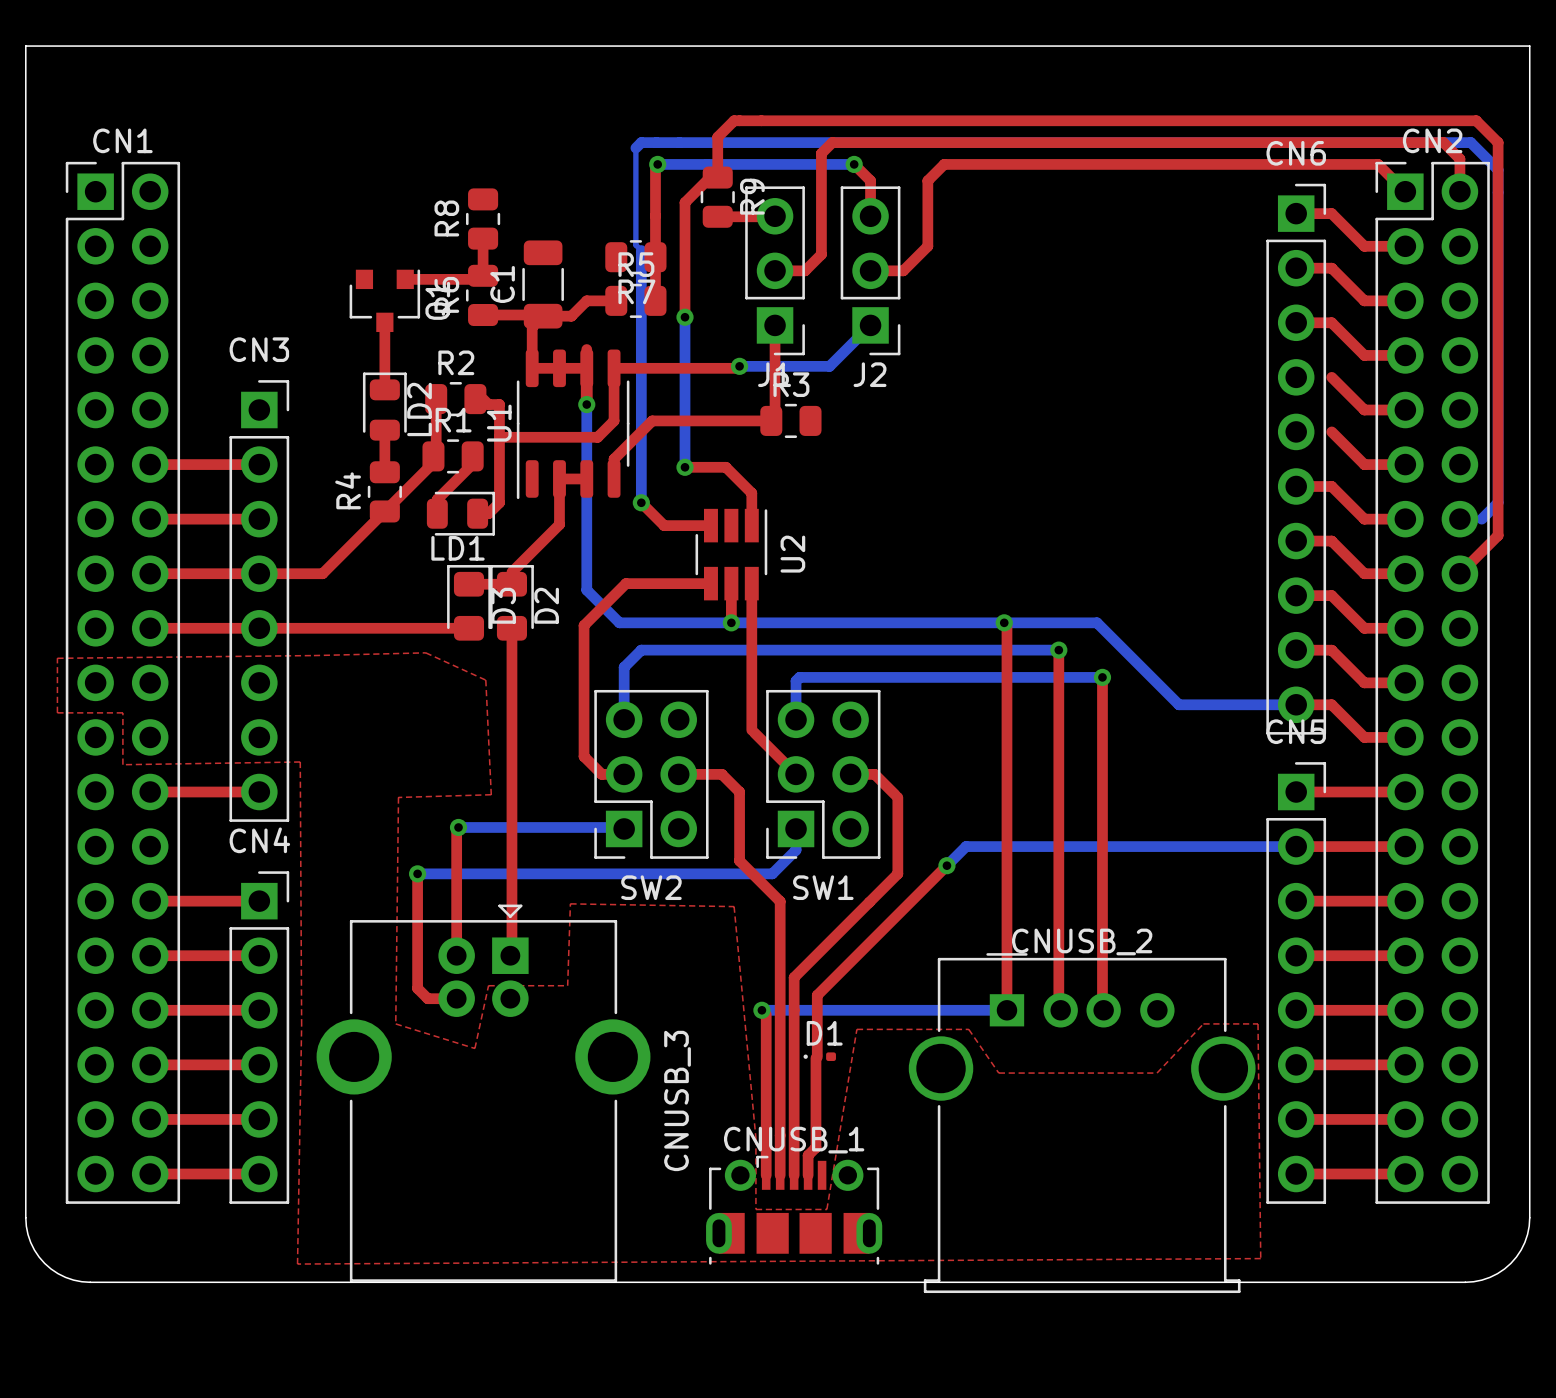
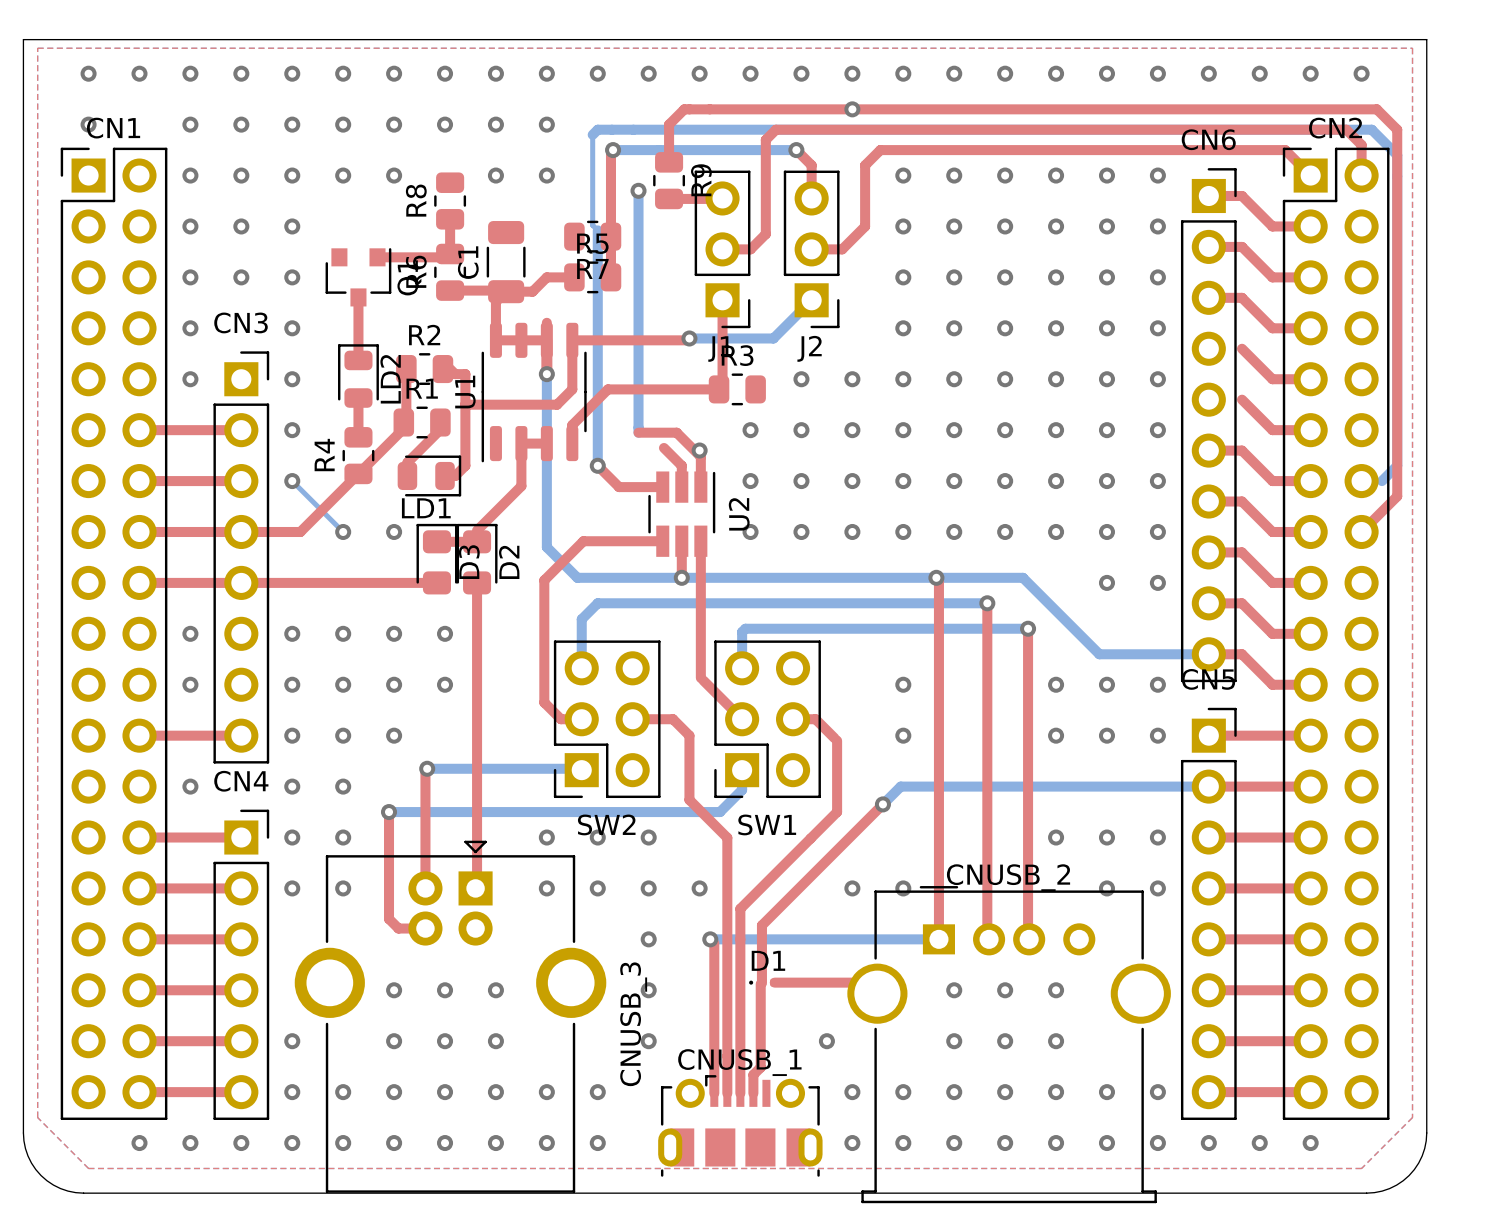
top zone outline: none -> (37, 48) (37, 1117) (88, 1168) (1361, 1168) (1412, 1117) (1412, 48) (37, 48)
via: none -> (88, 73)
via: none -> (139, 73)
via: none -> (190, 73)
via: none -> (241, 73)
via: none -> (292, 73)
via: none -> (343, 73)
via: none -> (394, 73)
via: none -> (445, 73)
via: none -> (495, 73)
via: none -> (546, 73)
via: none -> (597, 73)
via: none -> (648, 73)
via: none -> (699, 73)
via: none -> (750, 73)
via: none -> (801, 73)
via: none -> (852, 73)
via: none -> (903, 73)
via: none -> (954, 73)
via: none -> (1005, 73)
via: none -> (1056, 73)
via: none -> (1106, 73)
via: none -> (1157, 73)
via: none -> (1208, 73)
via: none -> (1259, 73)
via: none -> (1310, 73)
via: none -> (1361, 73)
via: none -> (852, 109)
via: none -> (88, 124)
via: none -> (190, 124)
via: none -> (241, 124)
via: none -> (292, 124)
via: none -> (343, 124)
via: none -> (394, 124)
via: none -> (445, 124)
via: none -> (495, 124)
via: none -> (546, 124)
top track: (710, 177) (685, 202) (685, 317) -> none
via: none -> (190, 175)
via: none -> (241, 175)
via: none -> (292, 175)
via: none -> (343, 175)
via: none -> (394, 175)
via: none -> (495, 175)
via: none -> (546, 175)
via: none -> (903, 175)
via: none -> (954, 175)
via: none -> (1005, 175)
via: none -> (1056, 175)
via: none -> (1106, 175)
via: none -> (1157, 175)
bottom track: none -> (638, 190) (638, 292)
via: none -> (638, 190)
via: none -> (190, 226)
via: none -> (241, 226)
via: none -> (292, 226)
via: none -> (903, 226)
via: none -> (954, 226)
via: none -> (1005, 226)
via: none -> (1056, 226)
via: none -> (1106, 226)
via: none -> (1157, 226)
via: none -> (190, 277)
via: none -> (241, 277)
via: none -> (292, 277)
via: none -> (903, 277)
via: none -> (954, 277)
via: none -> (1005, 277)
via: none -> (1056, 277)
via: none -> (1106, 277)
via: none -> (1157, 277)
via: (685, 317) -> none
via: none -> (190, 328)
via: none -> (292, 328)
via: none -> (903, 328)
via: none -> (954, 328)
via: none -> (1005, 328)
via: none -> (1056, 328)
via: none -> (1106, 328)
via: none -> (1157, 328)
via: none -> (190, 379)
via: none -> (292, 379)
via: none -> (801, 379)
via: none -> (852, 379)
via: none -> (903, 379)
via: none -> (954, 379)
via: none -> (1005, 379)
via: none -> (1056, 379)
via: none -> (1106, 379)
via: none -> (1157, 379)
via: none -> (292, 430)
via: none -> (750, 430)
via: none -> (801, 430)
via: none -> (852, 430)
via: none -> (903, 430)
via: none -> (954, 430)
via: none -> (1005, 430)
via: none -> (1056, 430)
via: none -> (1106, 430)
via: none -> (1157, 430)
via: (685, 467) -> none
top track: none -> (663, 447) (681, 465) (681, 487)
via: none -> (699, 450)
bottom track: none -> (292, 481) (343, 531)
via: none -> (292, 481)
via: none -> (750, 481)
via: none -> (801, 481)
via: none -> (852, 481)
via: none -> (903, 481)
via: none -> (954, 481)
via: none -> (1005, 481)
via: none -> (1056, 481)
via: none -> (1106, 481)
via: none -> (1157, 481)
via: none -> (343, 531)
via: none -> (394, 531)
via: none -> (750, 531)
via: none -> (801, 531)
via: none -> (852, 531)
via: none -> (903, 531)
via: none -> (954, 531)
via: none -> (1005, 531)
via: none -> (1056, 531)
via: none -> (1106, 531)
via: none -> (1157, 531)
via: none -> (1106, 582)
via: none -> (1157, 582)
top zone outline: (425, 652) (485, 680) (491, 794) (398, 797) (395, 1023) (474, 1048) (488, 985) (567, 985) (570, 903) (734, 906) (755, 1138) (755, 1209) (826, 1209) (856, 1029) (968, 1029) (998, 1073) (1157, 1073) (1203, 1023) (1258, 1023) (1260, 1258) (297, 1264) (301, 1025) (300, 761) (122, 764) (122, 712) (57, 712) (57, 658) (425, 652) -> none
via: none -> (190, 633)
via: none -> (292, 633)
via: none -> (343, 633)
via: none -> (394, 633)
via: none -> (445, 633)
via: none -> (190, 684)
via: none -> (292, 684)
via: none -> (343, 684)
via: none -> (394, 684)
via: none -> (445, 684)
via: none -> (903, 684)
via: none -> (1056, 684)
via: none -> (1106, 684)
via: none -> (1157, 684)
via: none -> (292, 735)
via: none -> (343, 735)
via: none -> (394, 735)
via: none -> (903, 735)
via: none -> (1056, 735)
via: none -> (1106, 735)
via: none -> (1157, 735)
via: none -> (190, 786)
via: none -> (292, 786)
via: none -> (343, 786)
via: none -> (292, 837)
via: none -> (343, 837)
via: none -> (546, 837)
via: none -> (597, 837)
via: none -> (648, 837)
via: none -> (1056, 837)
via: none -> (1106, 837)
via: none -> (1157, 837)
via: none -> (292, 888)
via: none -> (343, 888)
via: none -> (546, 888)
via: none -> (597, 888)
via: none -> (648, 888)
via: none -> (699, 888)
via: none -> (852, 888)
via: none -> (903, 888)
via: none -> (1106, 888)
via: none -> (1157, 888)
via: none -> (648, 939)
top track: none -> (774, 982) (866, 982) (877, 993)
via: none -> (394, 990)
via: none -> (445, 990)
via: none -> (495, 990)
via: none -> (648, 990)
via: none -> (954, 990)
via: none -> (1005, 990)
via: none -> (1056, 990)
via: none -> (292, 1041)
via: none -> (394, 1041)
via: none -> (445, 1041)
via: none -> (495, 1041)
via: none -> (648, 1041)
via: none -> (826, 1041)
via: none -> (954, 1041)
via: none -> (1005, 1041)
via: none -> (1056, 1041)
via: none -> (292, 1092)
via: none -> (343, 1092)
via: none -> (394, 1092)
via: none -> (445, 1092)
via: none -> (495, 1092)
via: none -> (546, 1092)
via: none -> (597, 1092)
via: none -> (852, 1092)
via: none -> (903, 1092)
via: none -> (954, 1092)
via: none -> (1005, 1092)
via: none -> (1056, 1092)
via: none -> (1106, 1092)
via: none -> (1157, 1092)
via: none -> (139, 1143)
via: none -> (190, 1143)
via: none -> (241, 1143)
via: none -> (292, 1143)
via: none -> (343, 1143)
via: none -> (394, 1143)
via: none -> (445, 1143)
via: none -> (495, 1143)
via: none -> (546, 1143)
via: none -> (597, 1143)
via: none -> (852, 1143)
via: none -> (903, 1143)
via: none -> (954, 1143)
via: none -> (1005, 1143)
via: none -> (1056, 1143)
via: none -> (1106, 1143)
via: none -> (1157, 1143)
via: none -> (1208, 1143)
via: none -> (1259, 1143)
via: none -> (1310, 1143)

